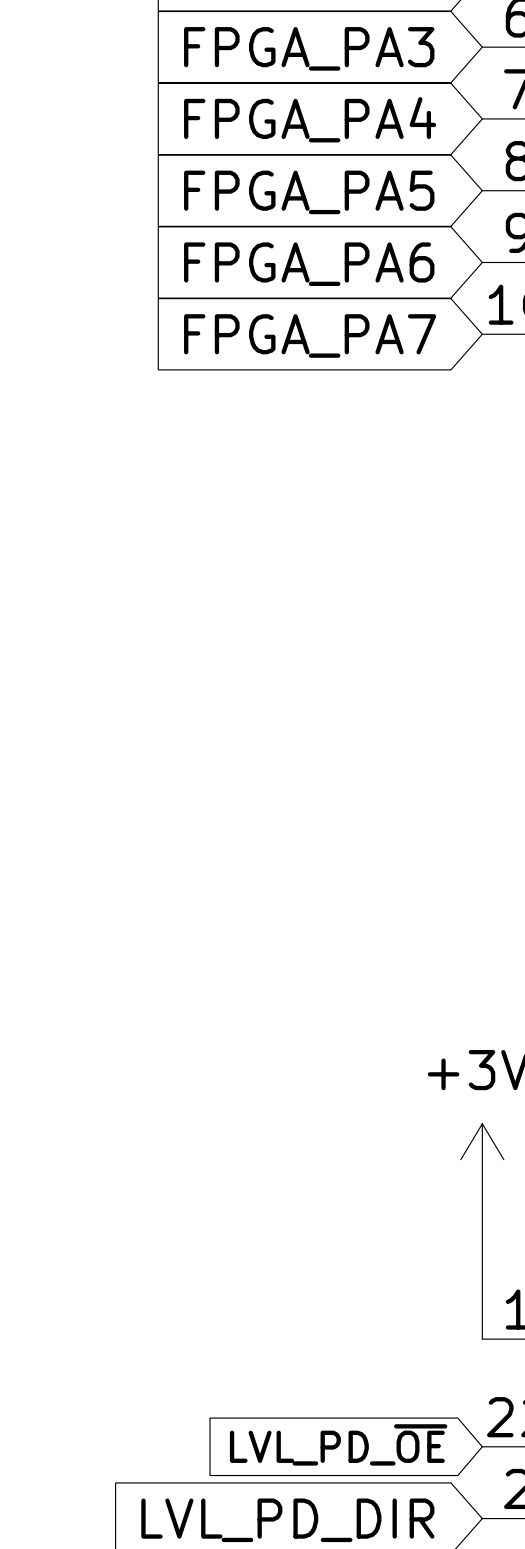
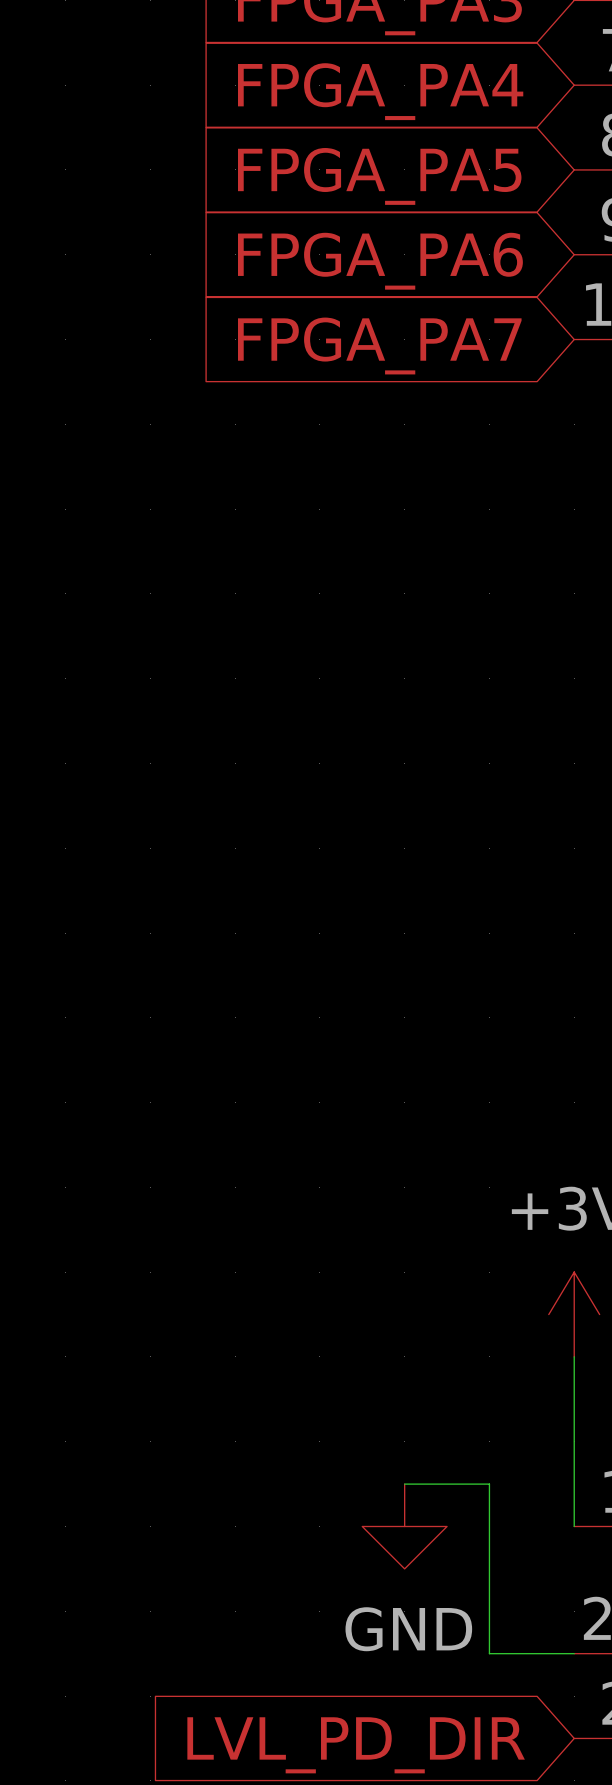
wire: none -> (404, 1484) (489, 1484) (489, 1653) (574, 1653)
power symbol: none -> GND (404, 1526)
global label: LVL_PD_~{OE} (338, 1444) -> none

